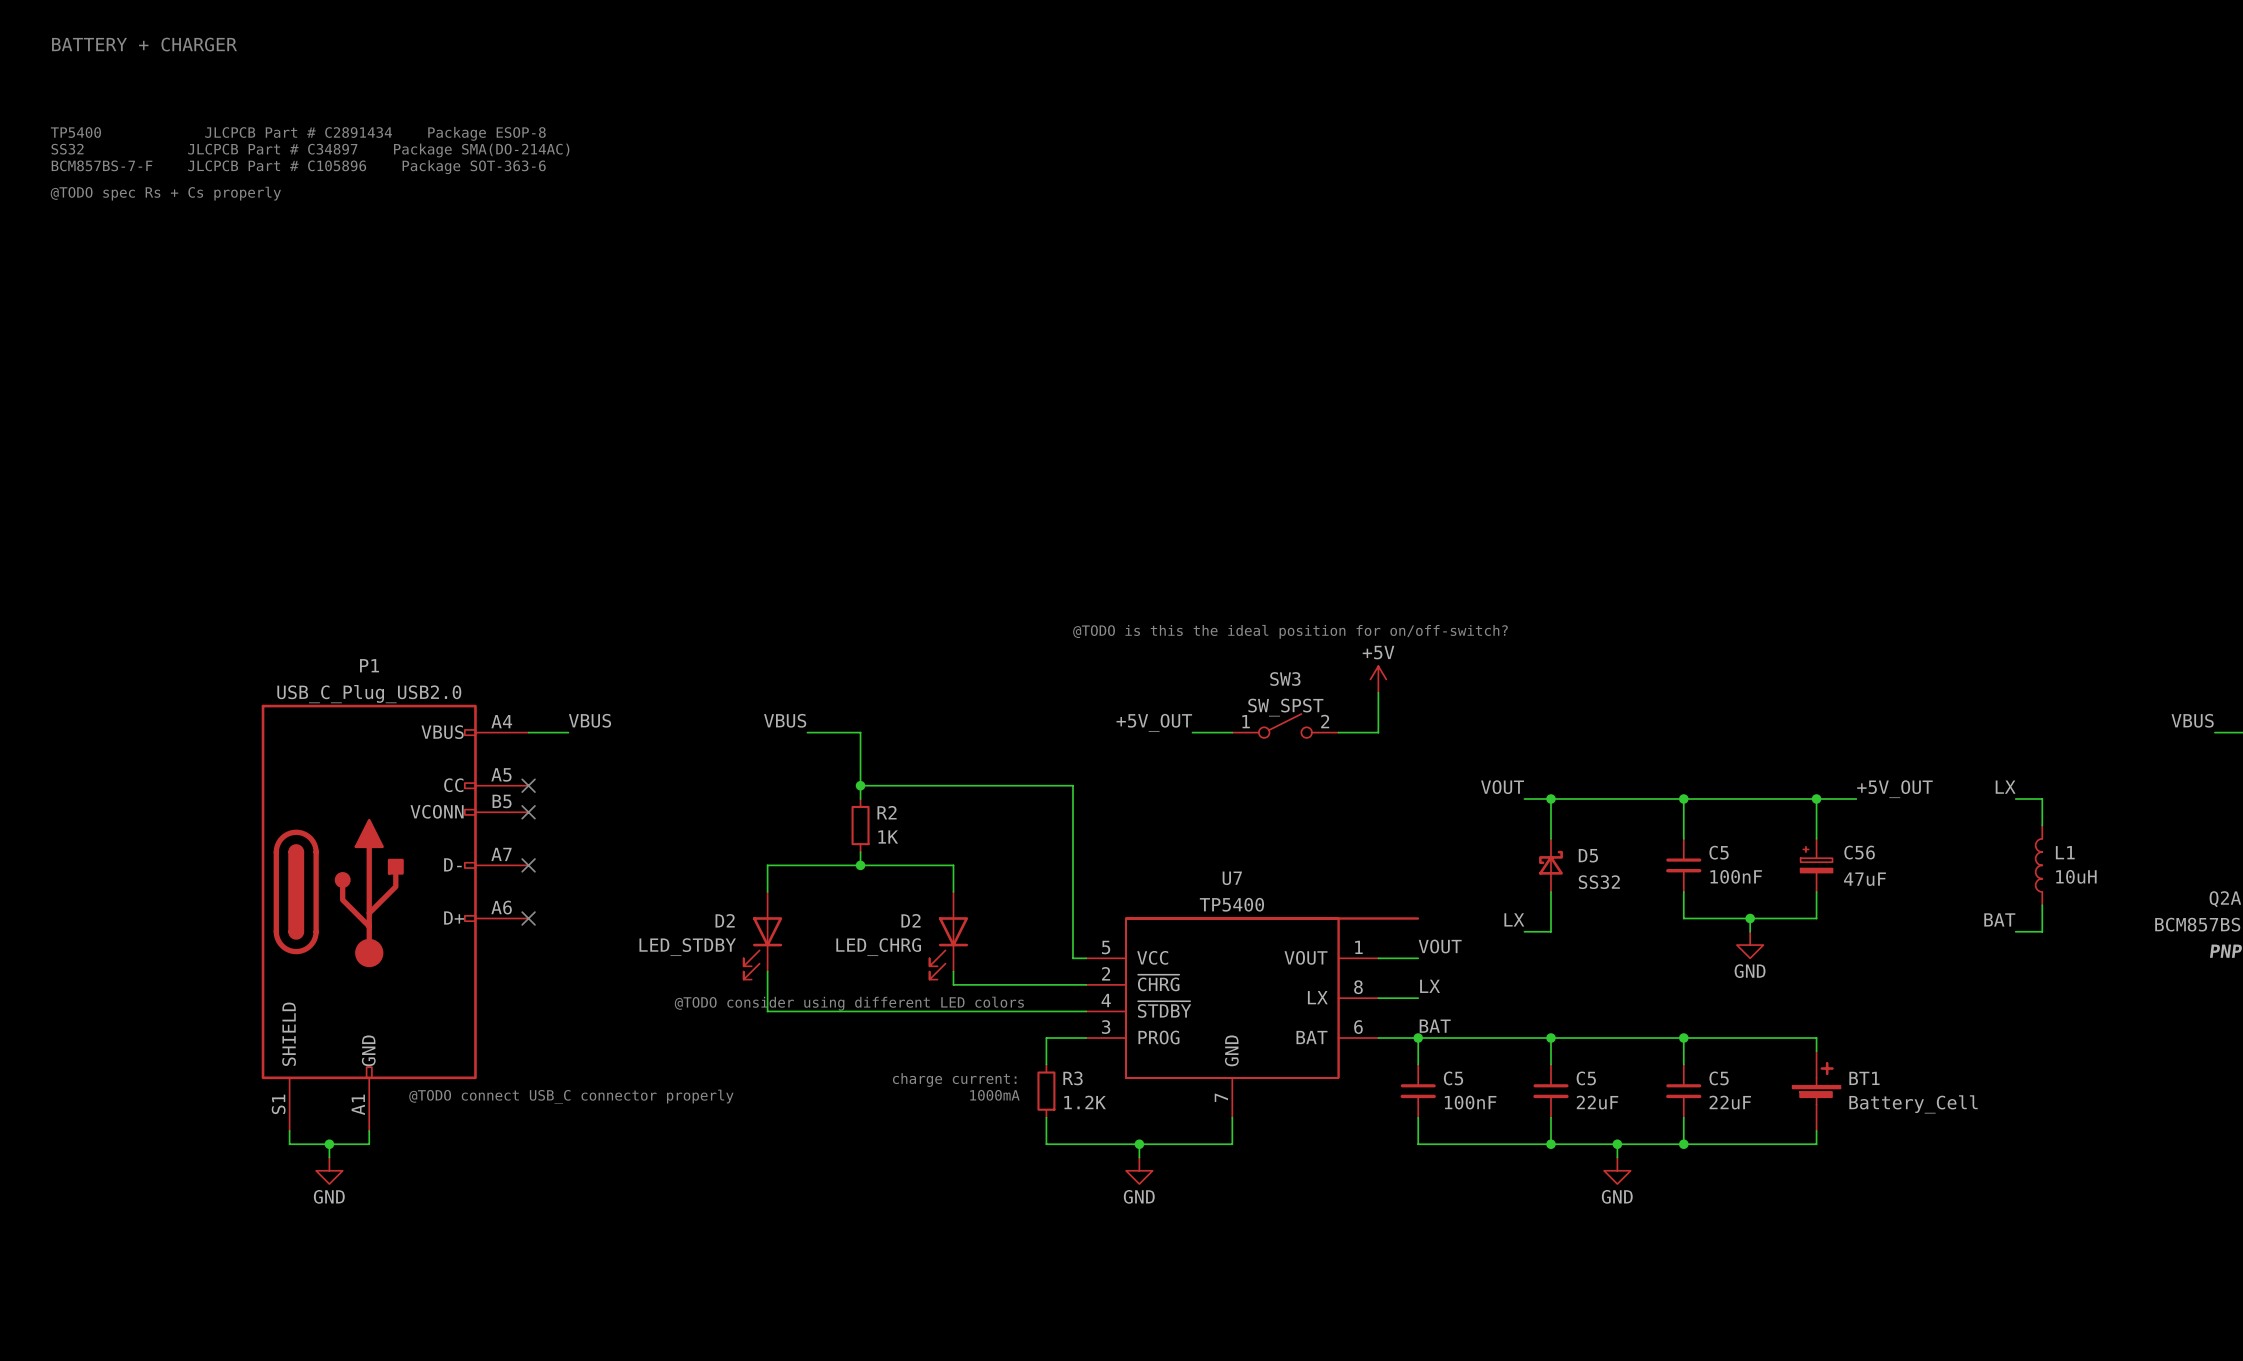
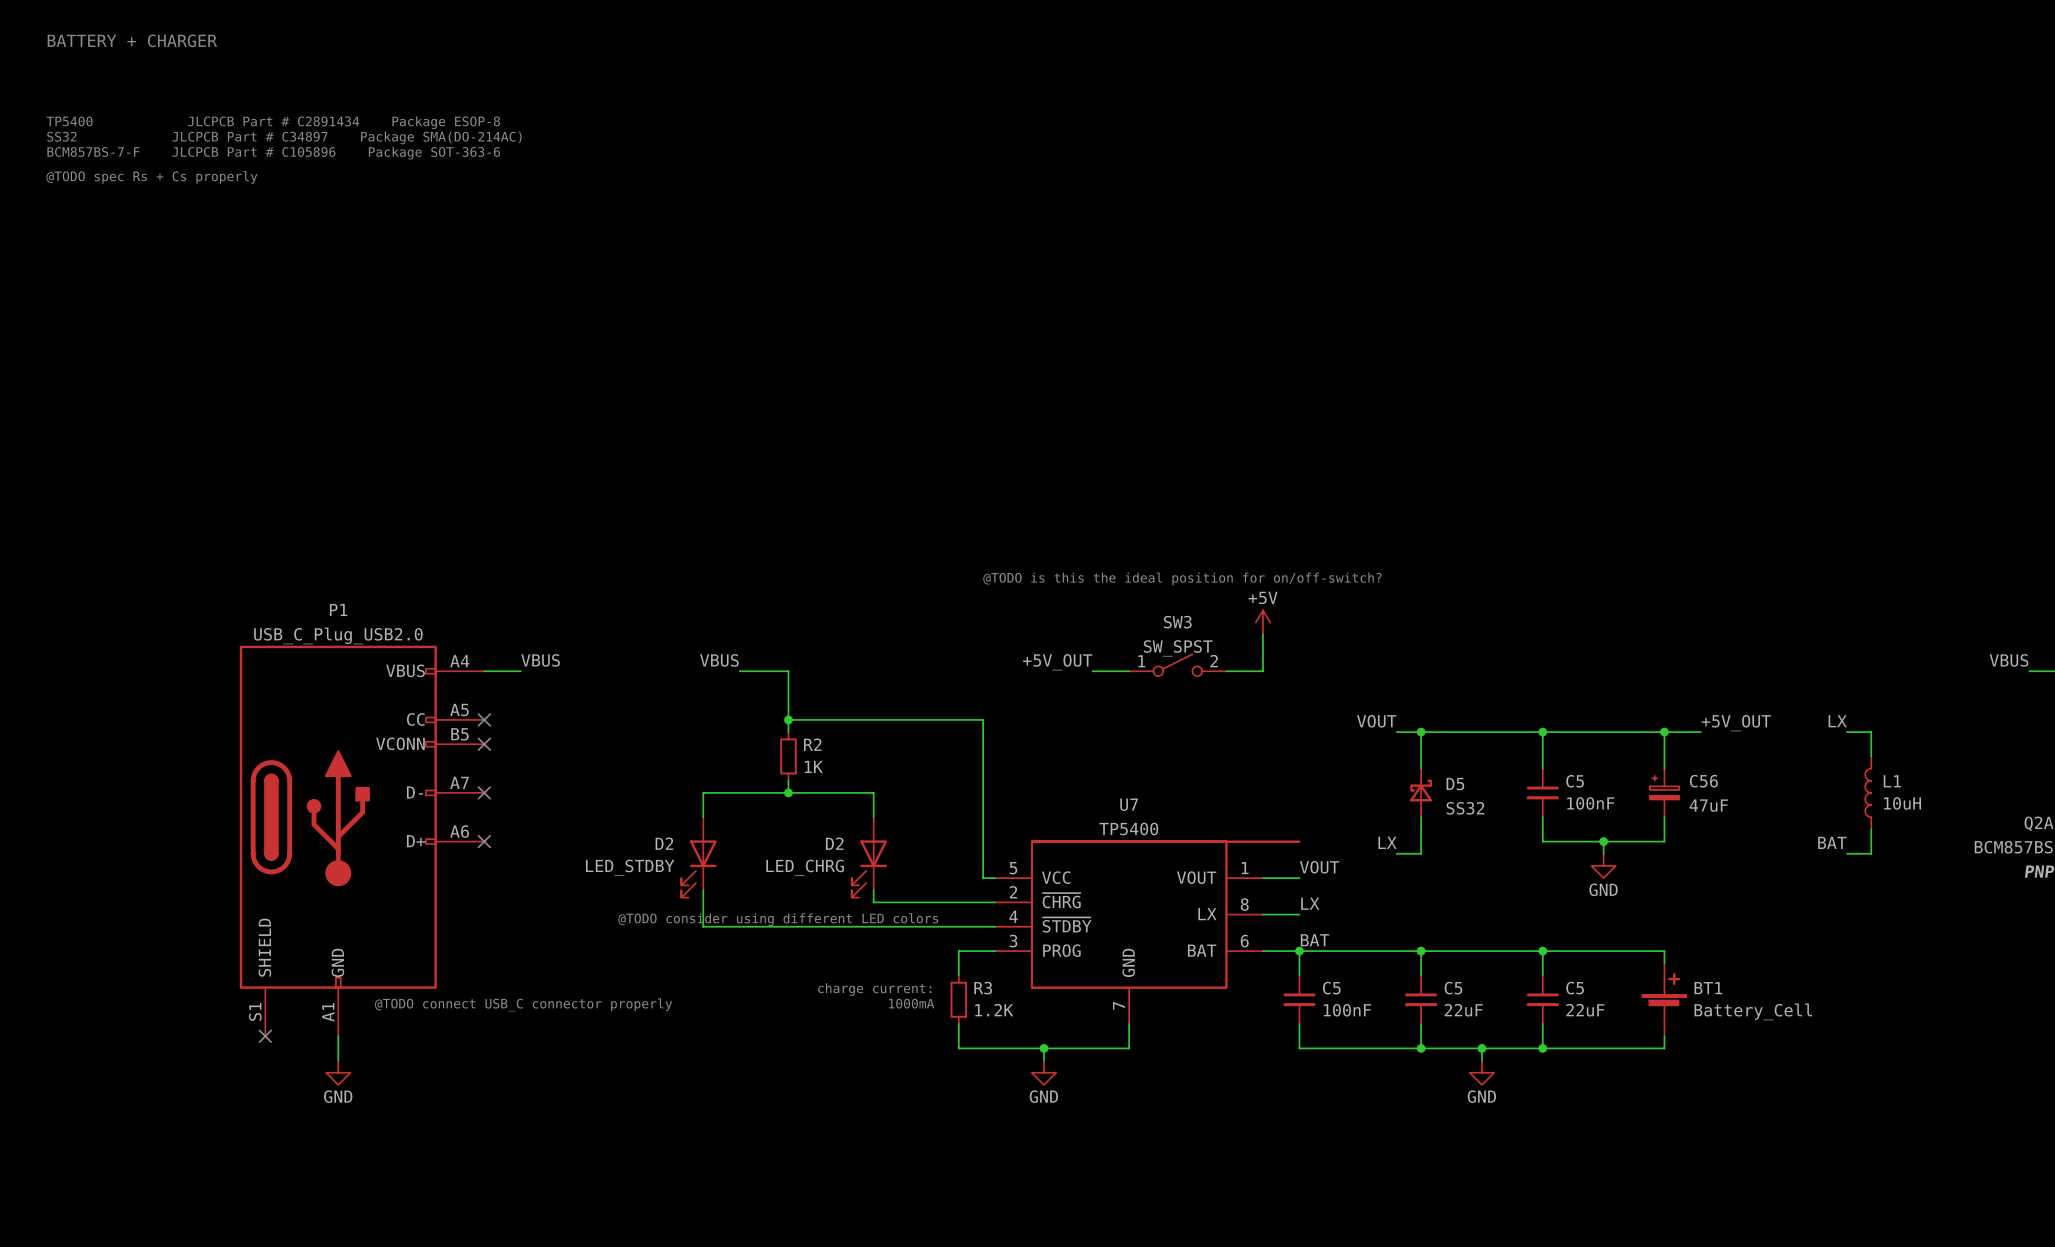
wire: (289, 1130) (289, 1144) (369, 1144) -> (338, 1060) (338, 1048)
no-connect mark: none -> (265, 1036)
wire: (329, 1144) (329, 1157) -> none
junction: (329, 1144) -> none
power symbol position: GND (329, 1170) -> GND (338, 1072)

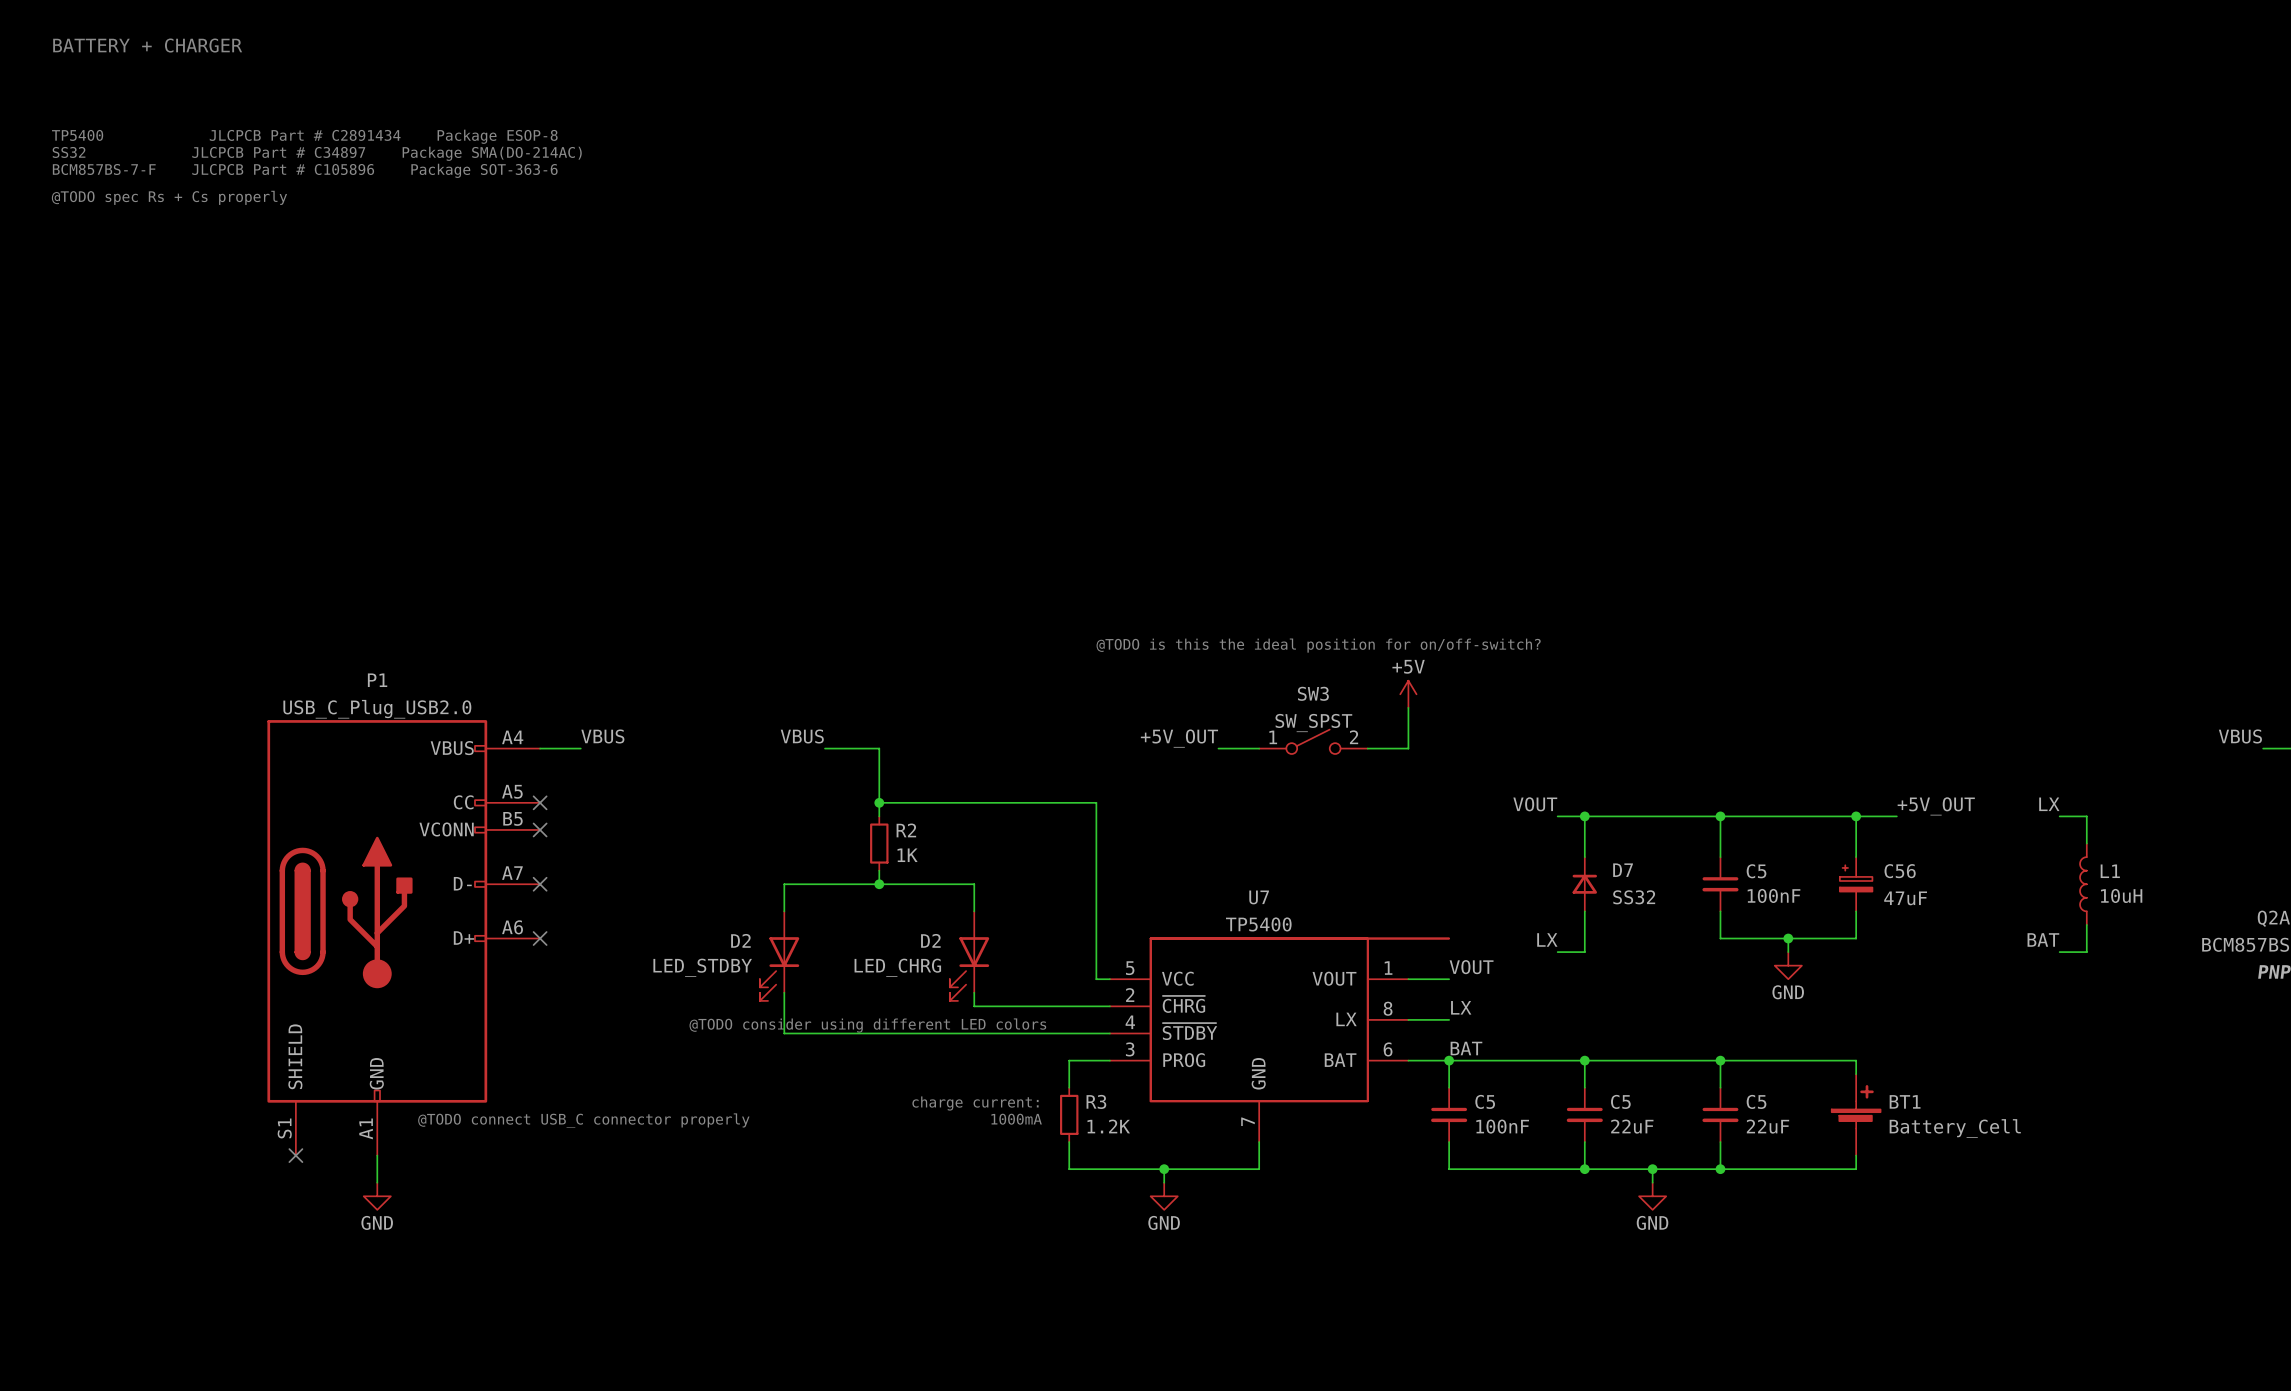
D5: SS32 (1421, 792) -> none
D7: none -> SS32 (1584, 884)

